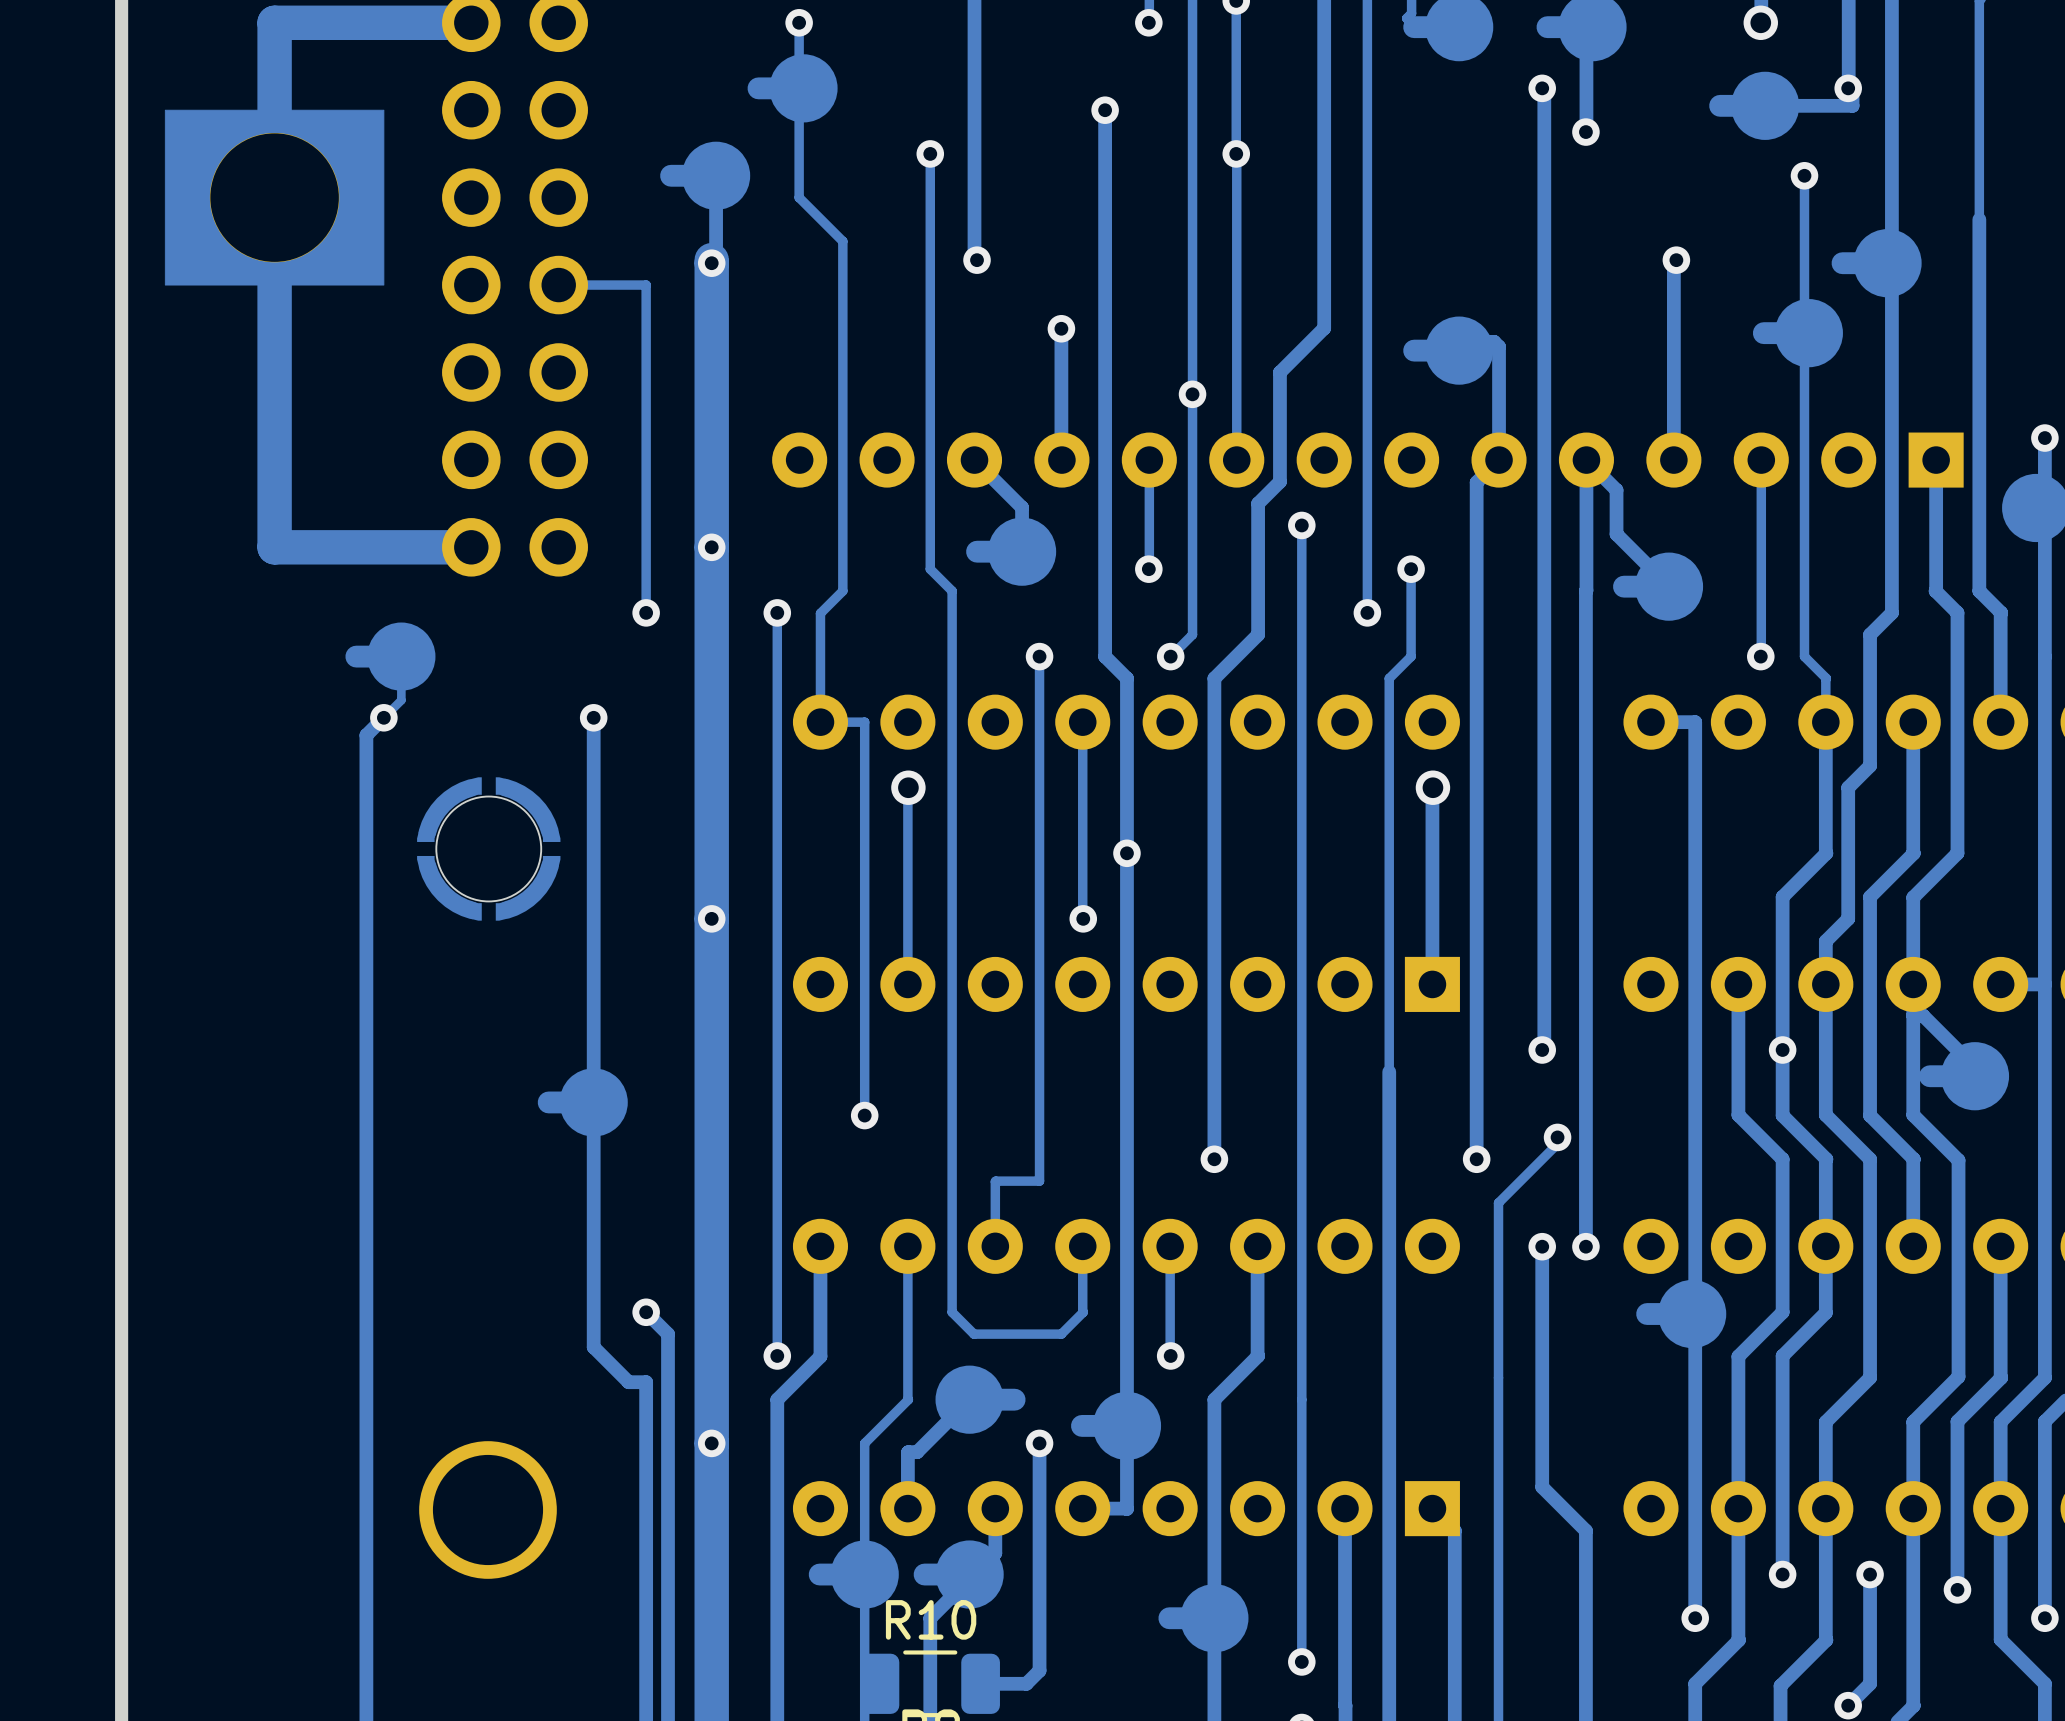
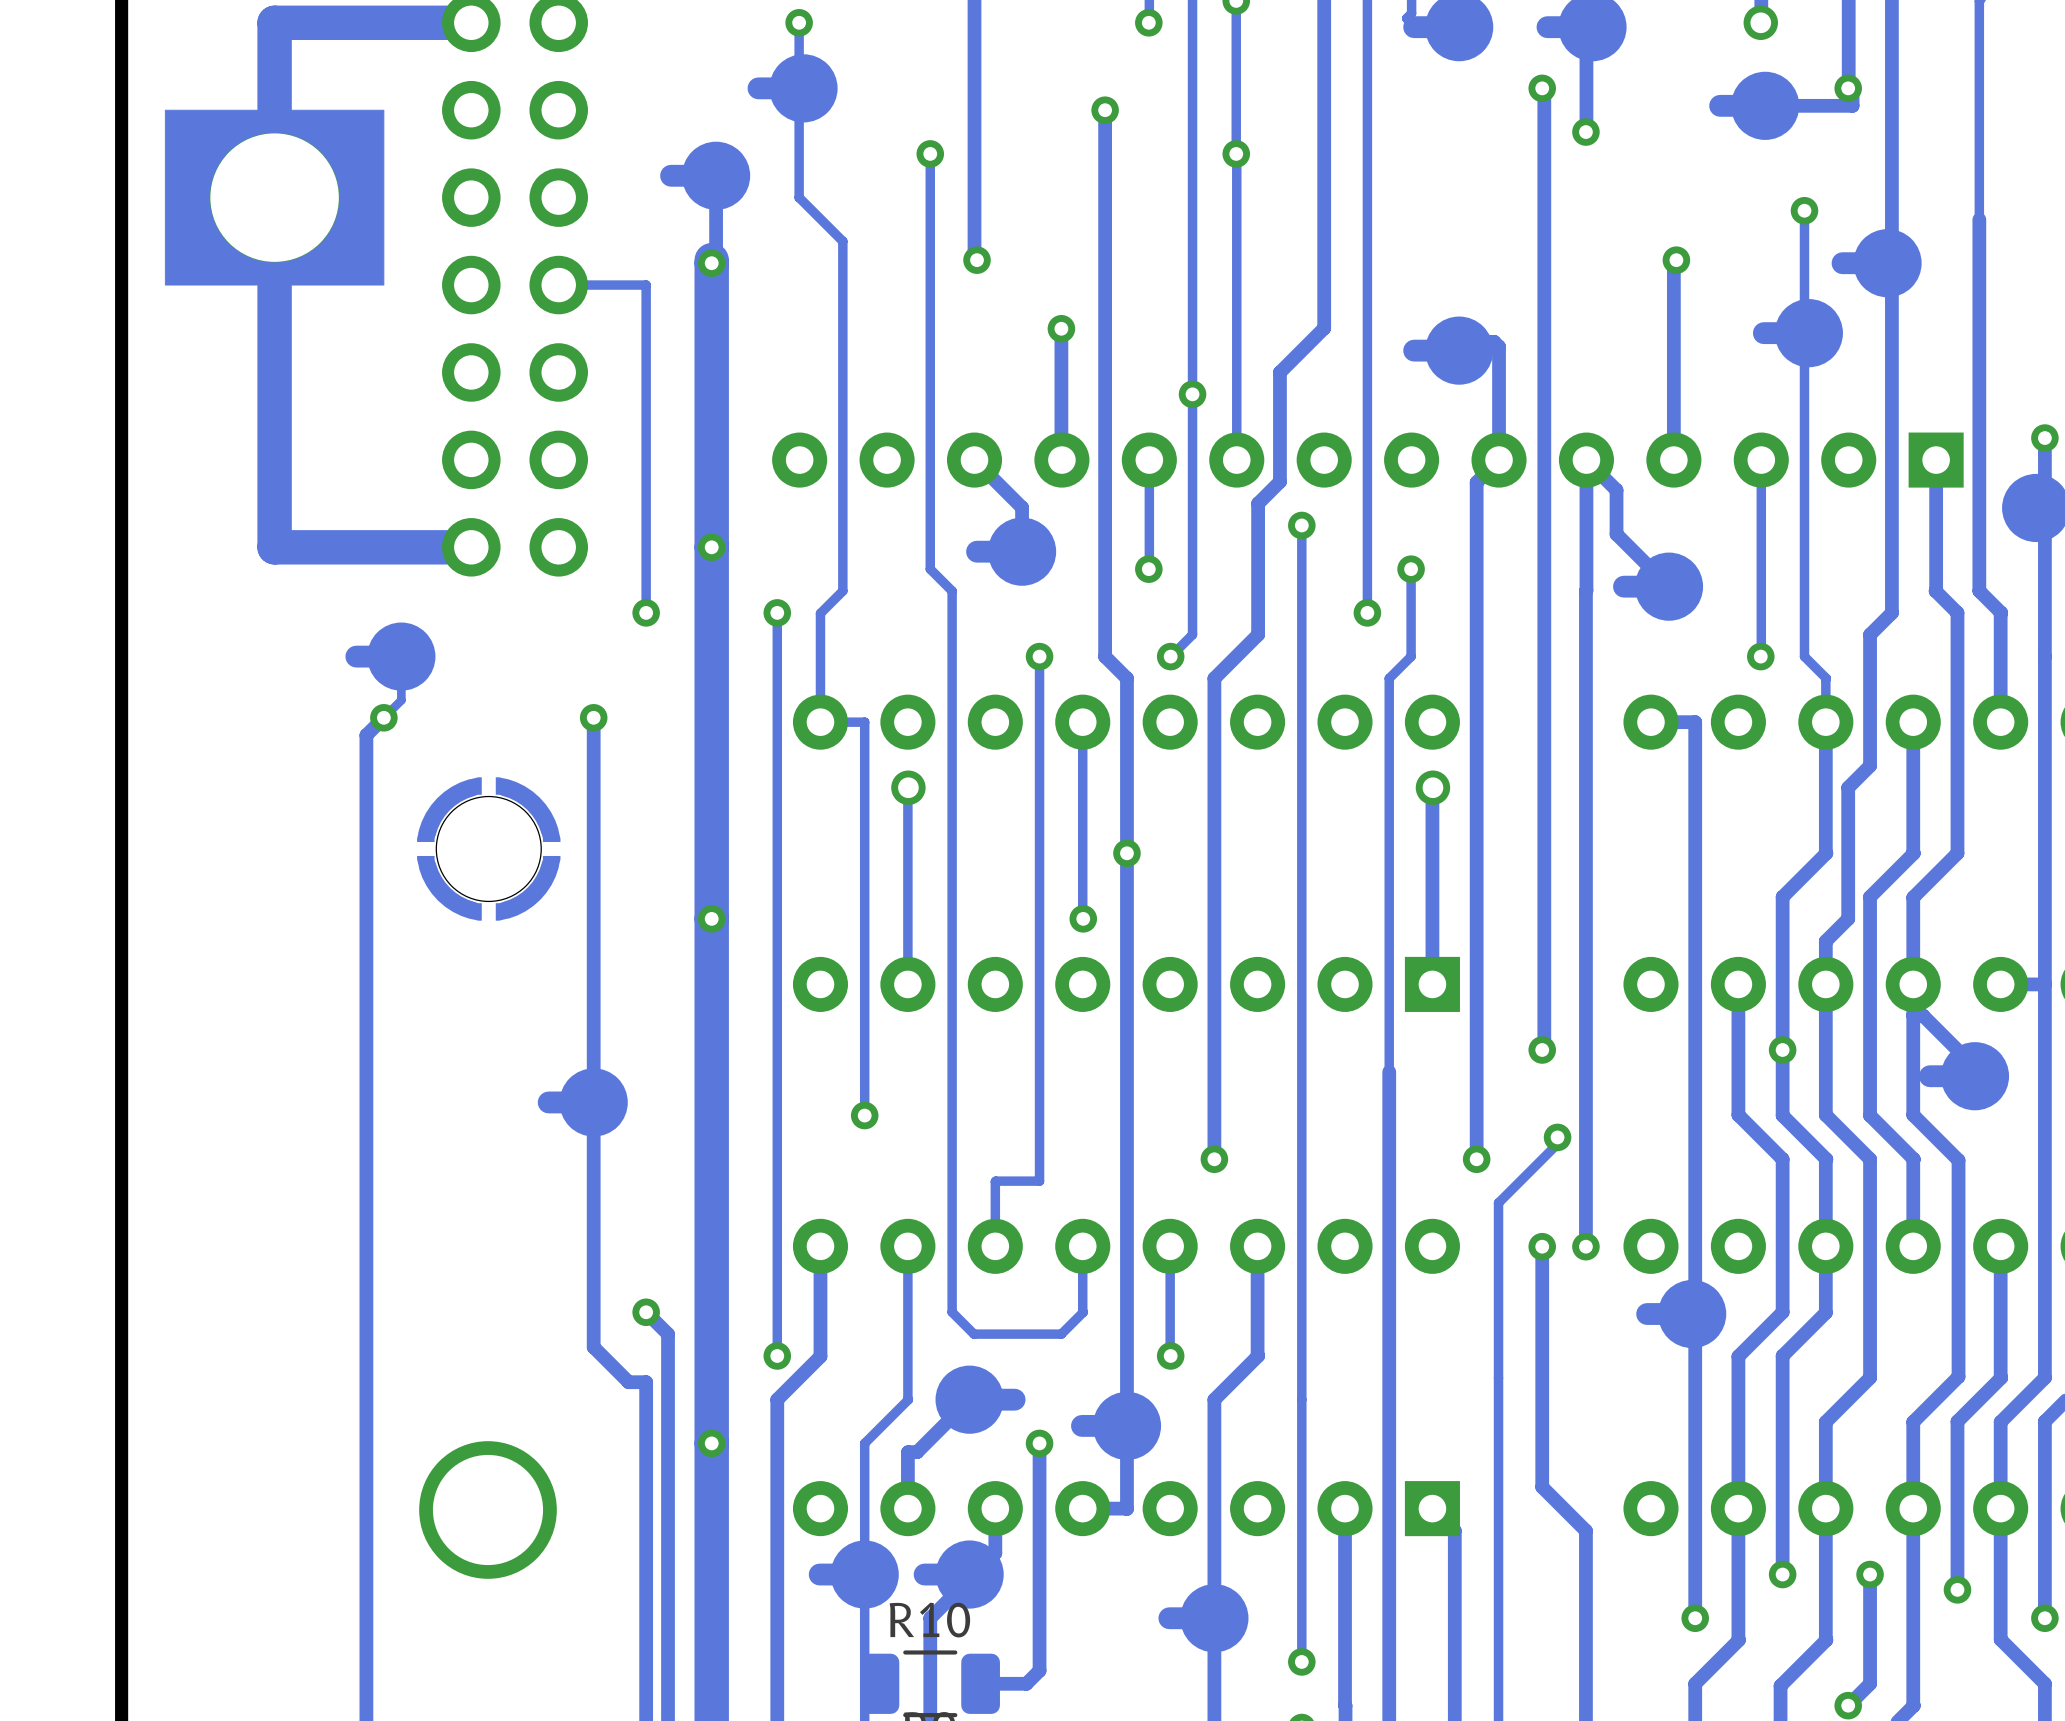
track: (1804, 175) (1804, 210) -> none
via position: (1804, 175) -> (1804, 210)

